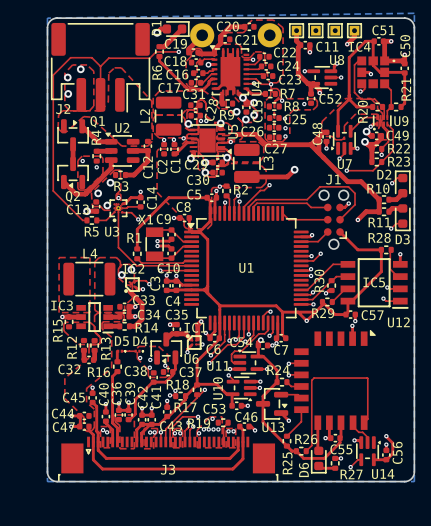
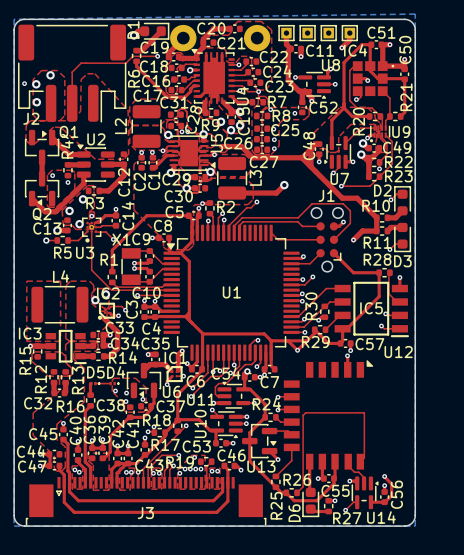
top track: (100, 66) (91, 57) (70, 57) (53, 75) (53, 190) (82, 220) -> (46, 240) (52, 240)
via: none -> (24, 83)
via: (242, 97) -> none
via: none -> (46, 240)

